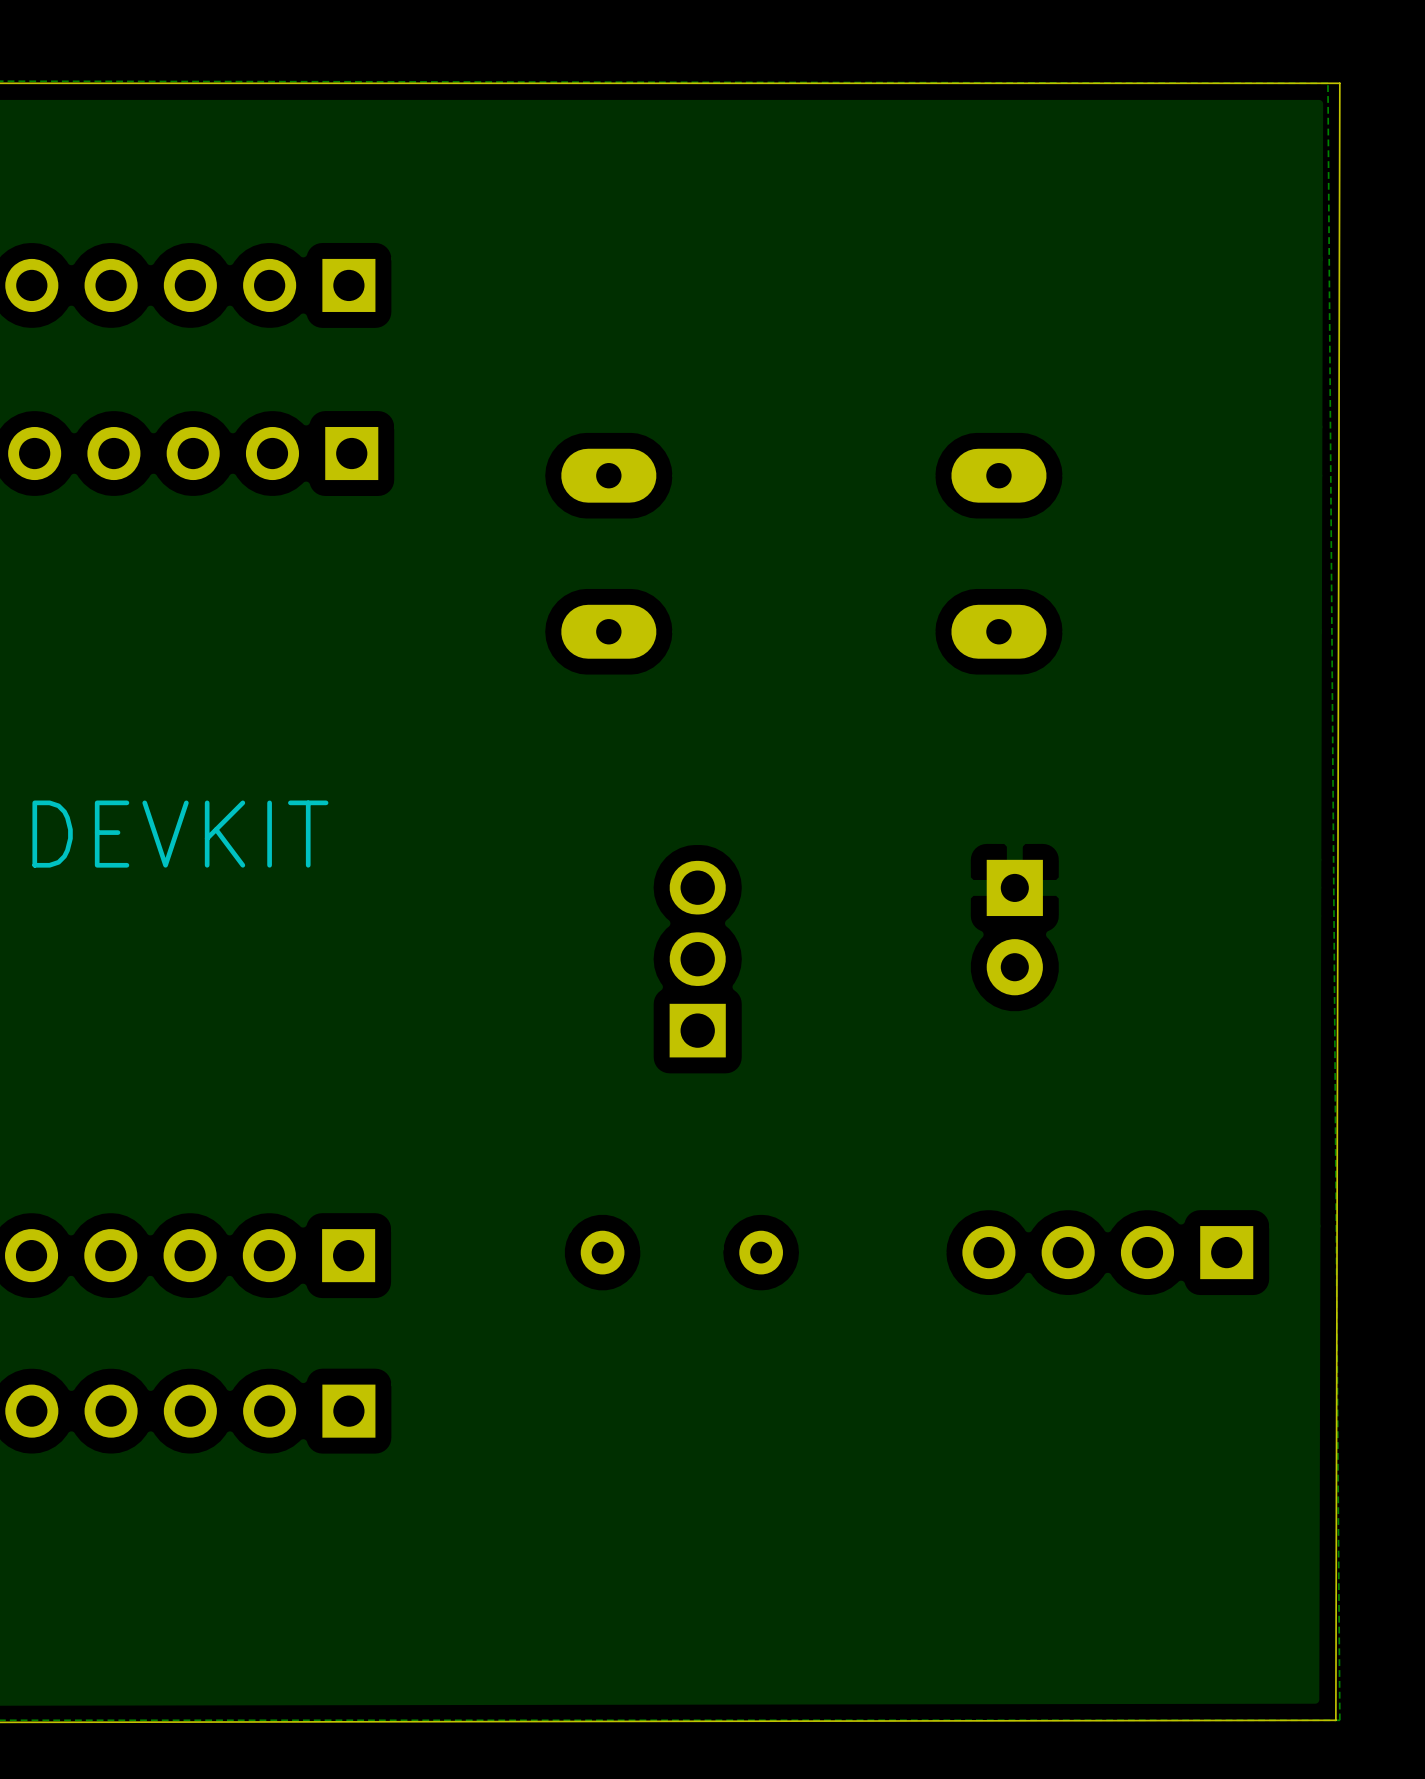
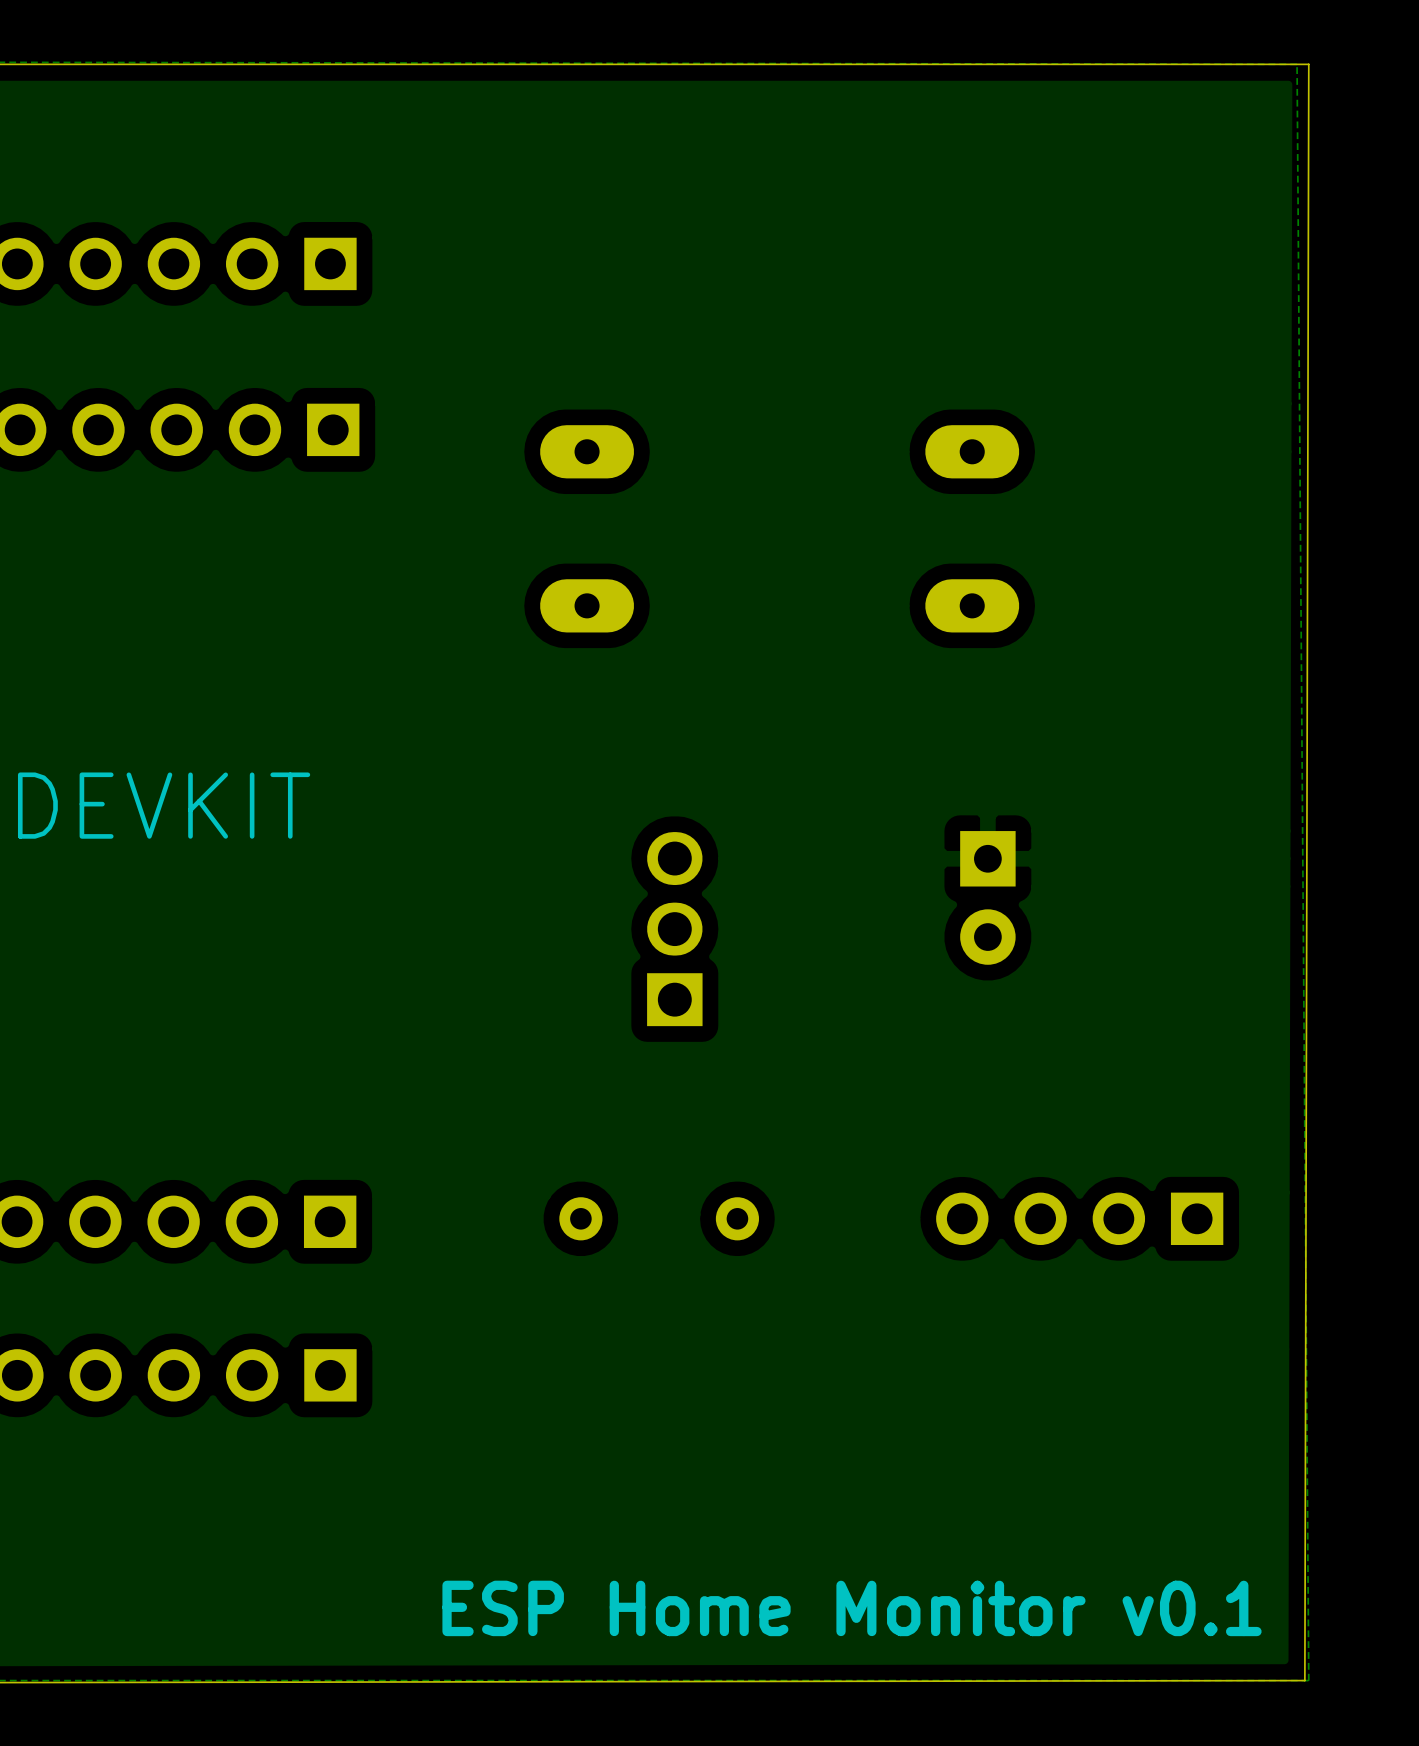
text: none -> ESP Home Monitor v0.1 (852, 1608)

